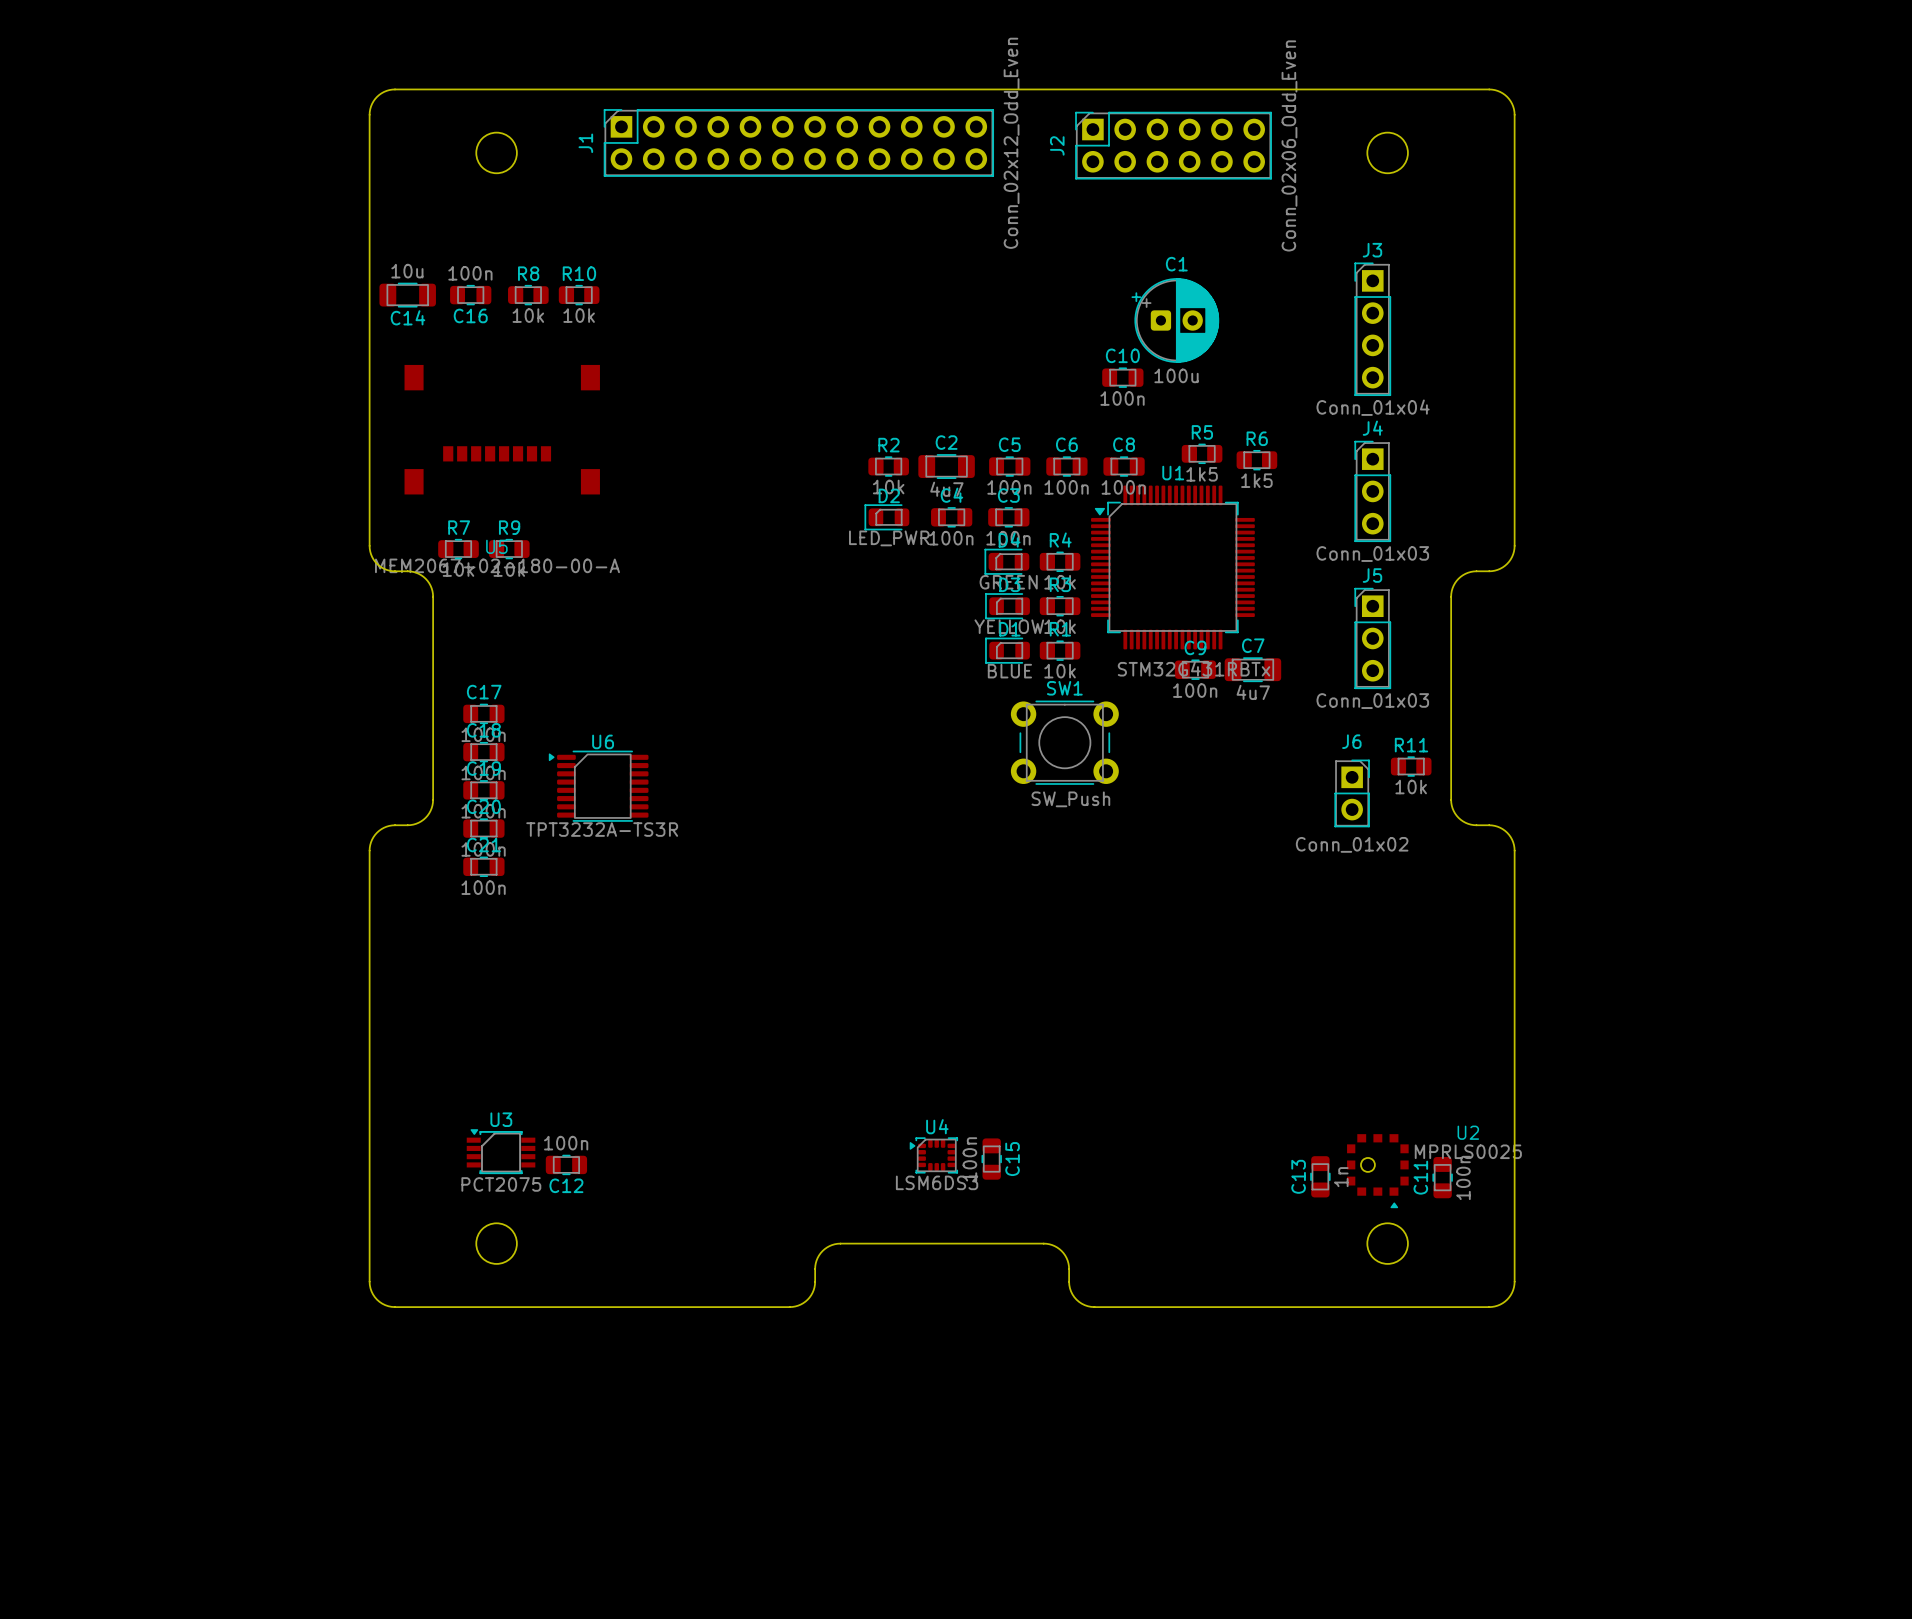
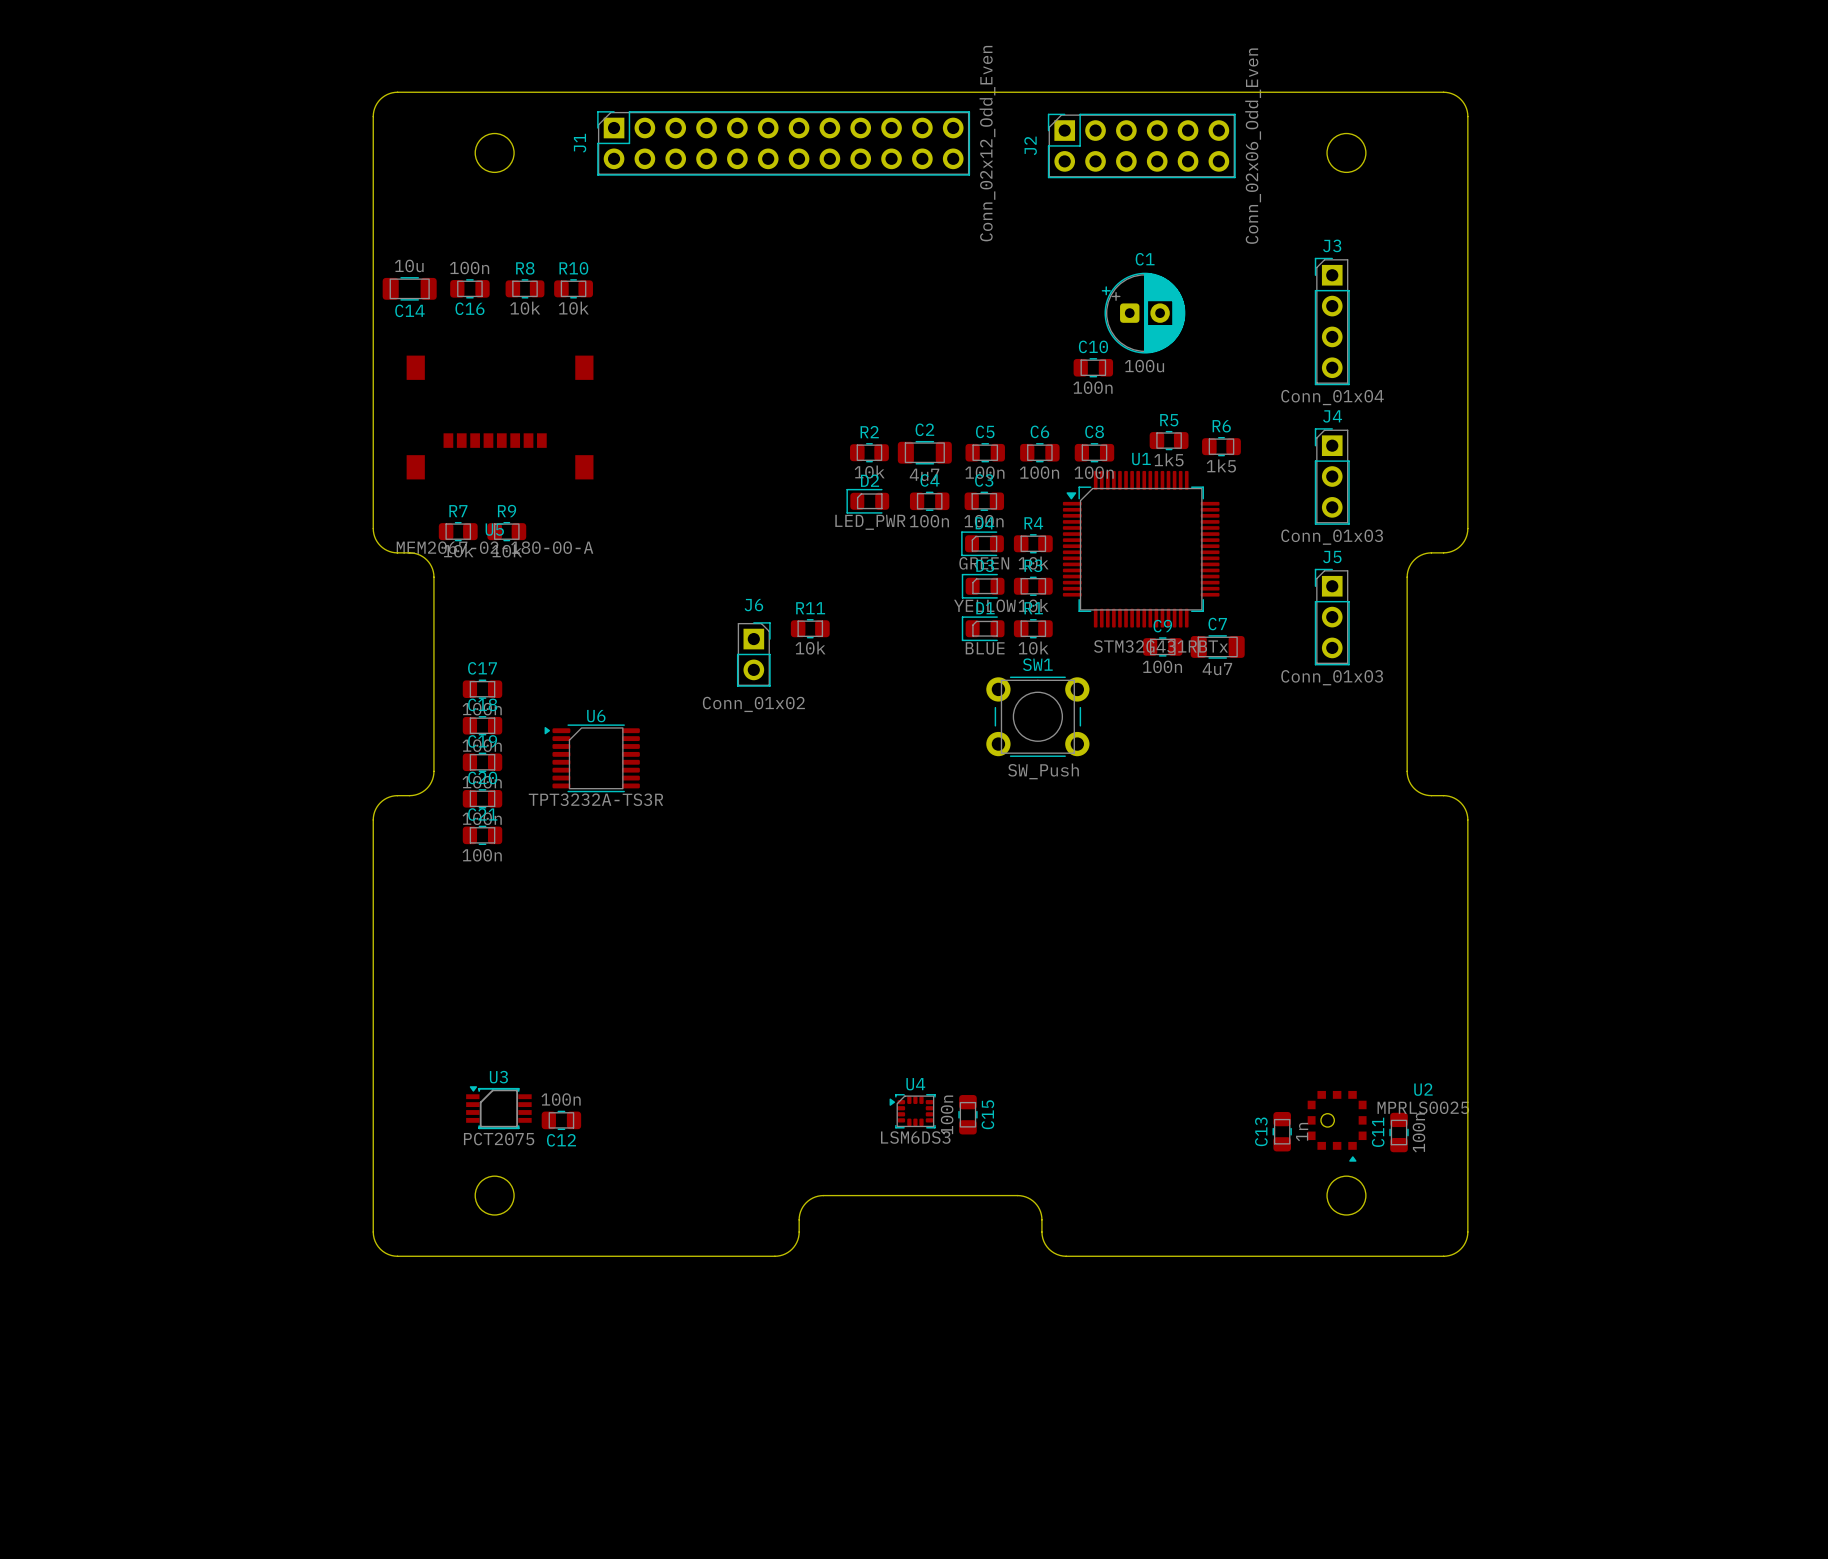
R11 position: (1411, 766) -> (810, 628)
J6 position: (1352, 793) -> (753, 654)

